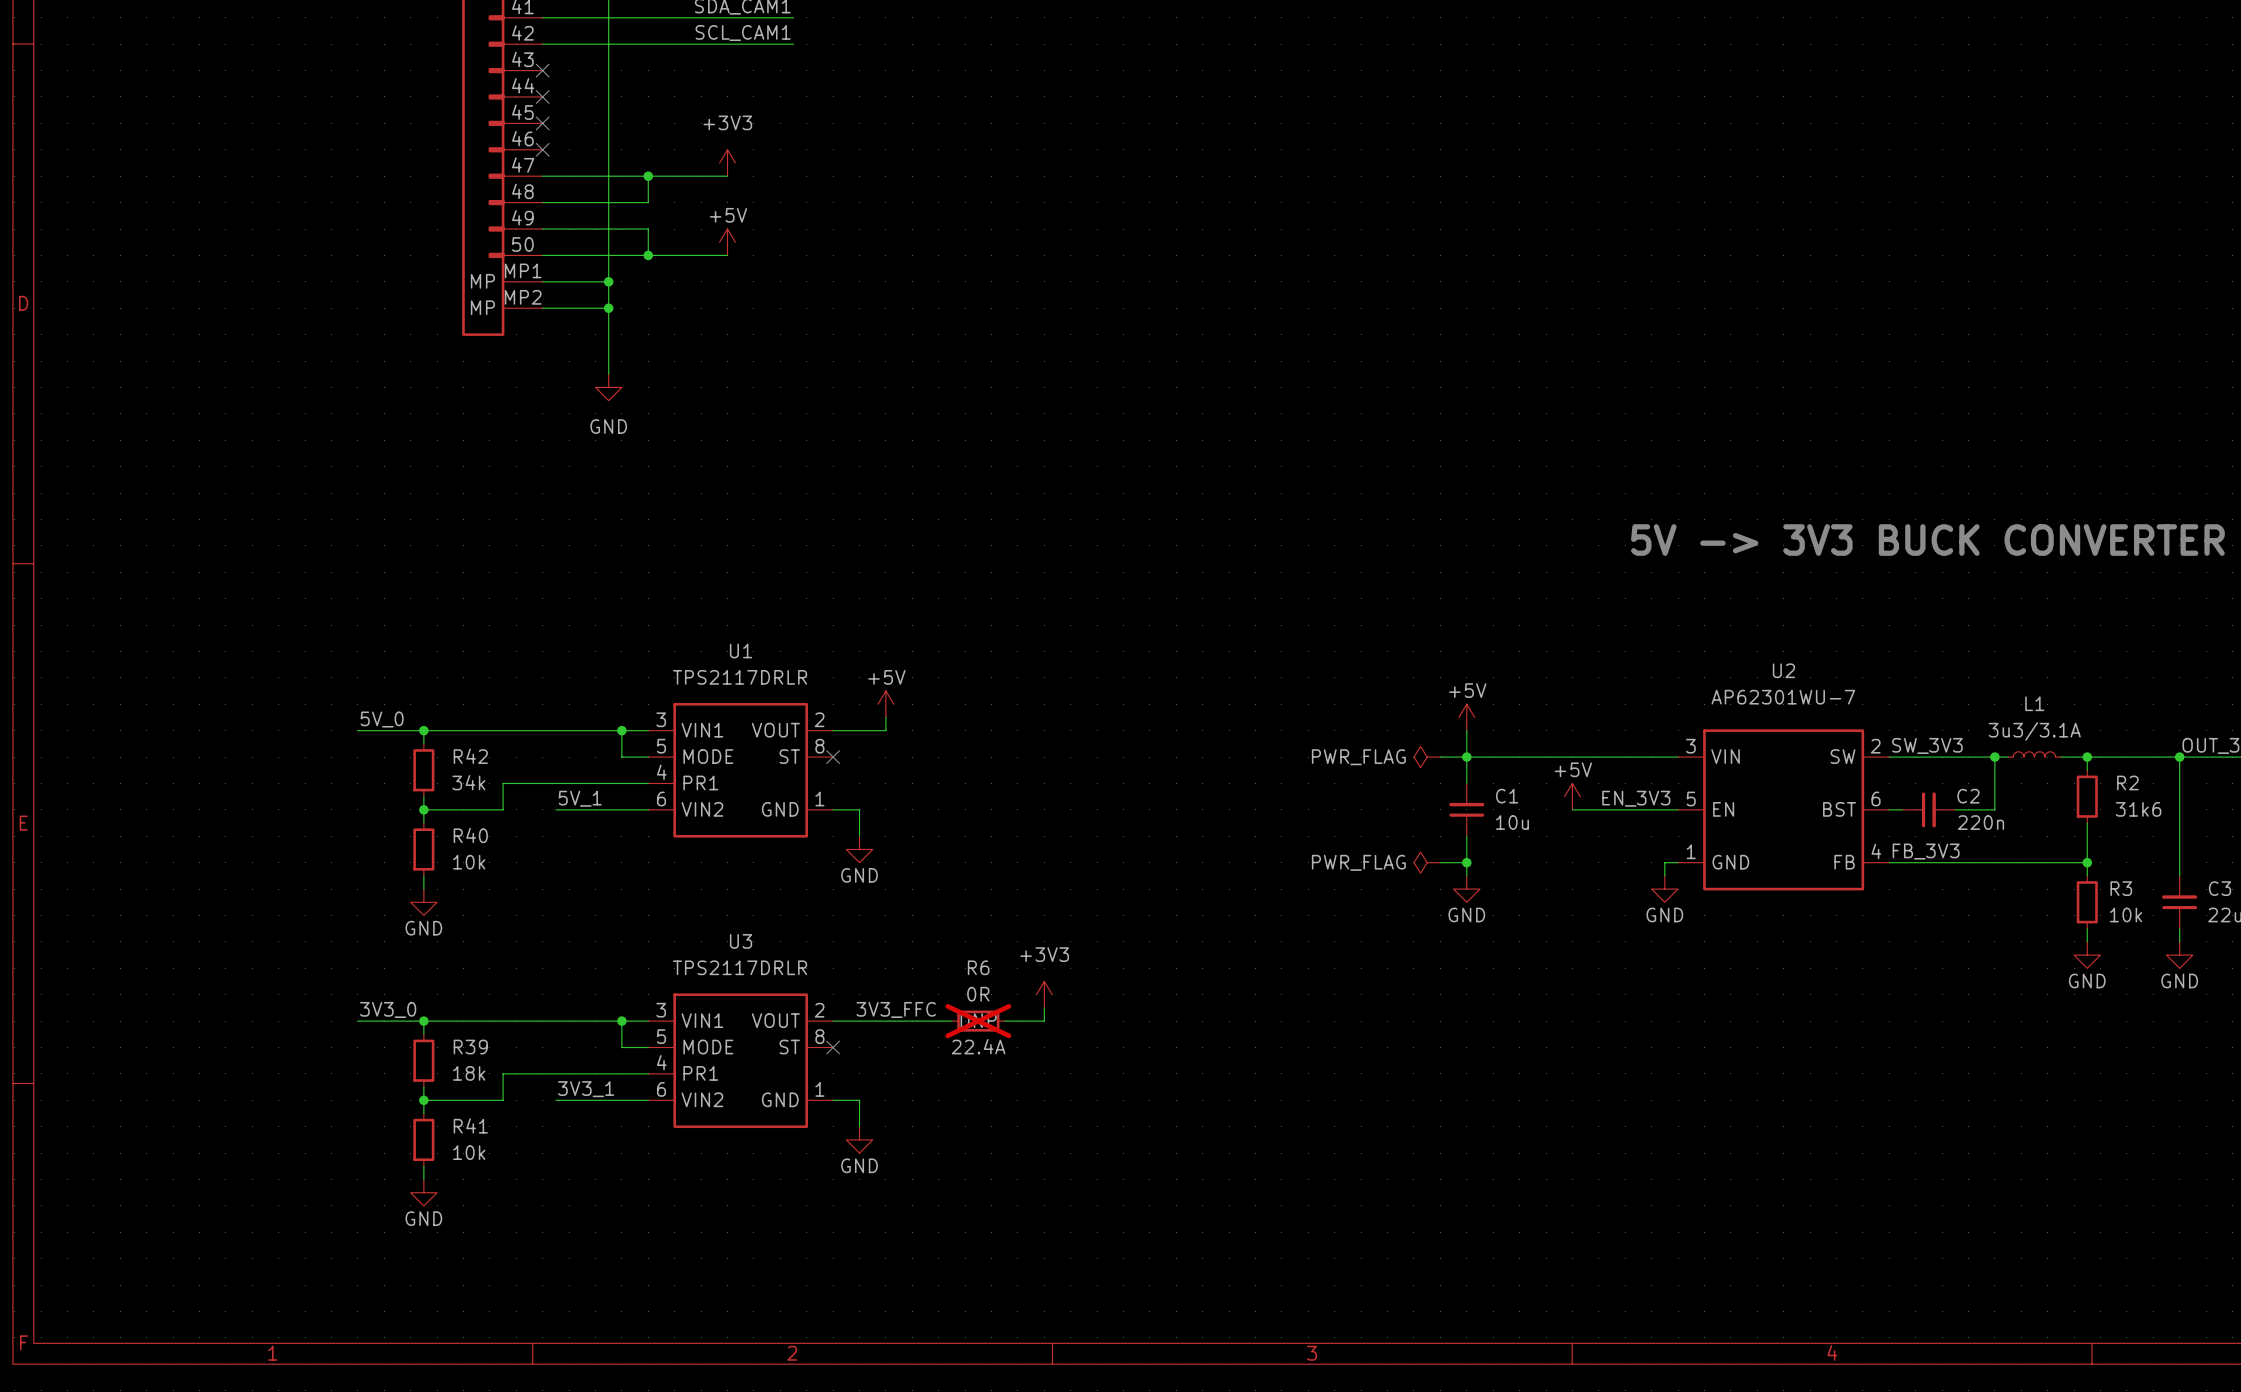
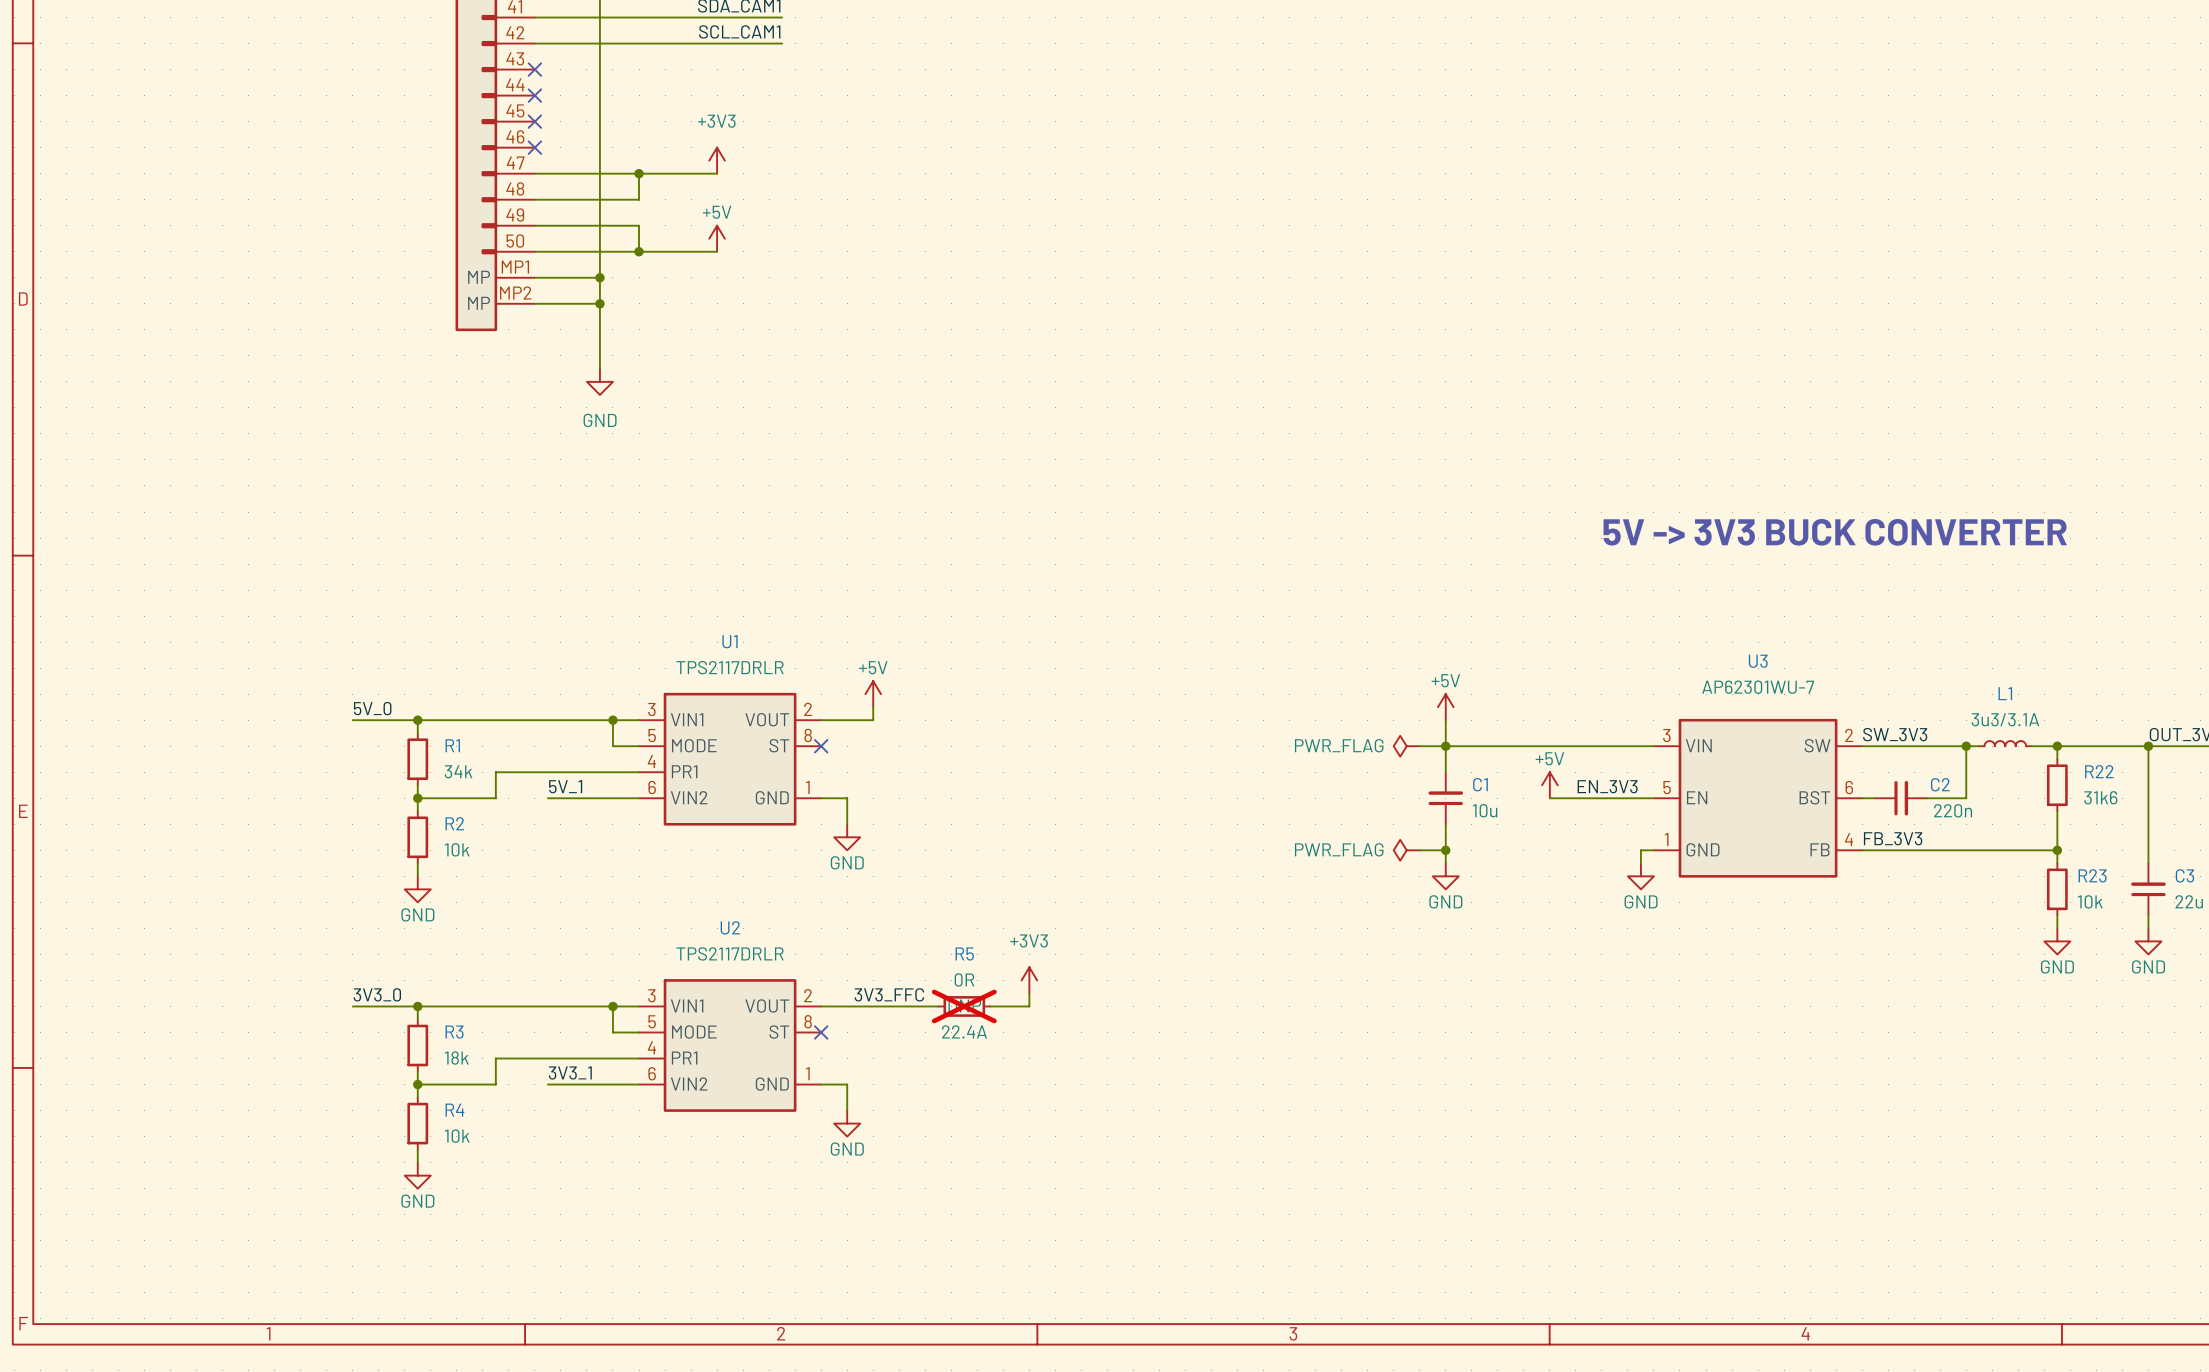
U2 name: U2 (1783, 670) -> U3 (1758, 661)
R42 name: R42 (470, 756) -> R1 (452, 745)
R2 name: R2 (2127, 782) -> R22 (2099, 771)
R40 name: R40 (470, 835) -> R2 (454, 823)
R3 name: R3 (2121, 888) -> R23 (2092, 875)
U3 name: U3 (741, 941) -> U2 (730, 927)
R6 name: R6 (978, 967) -> R5 (964, 953)
R39 name: R39 (470, 1047) -> R3 (454, 1032)
R41 name: R41 (470, 1125) -> R4 (454, 1110)

